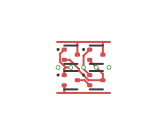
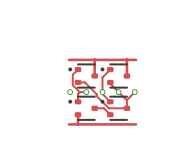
track: none -> (134, 92) (126, 99)

